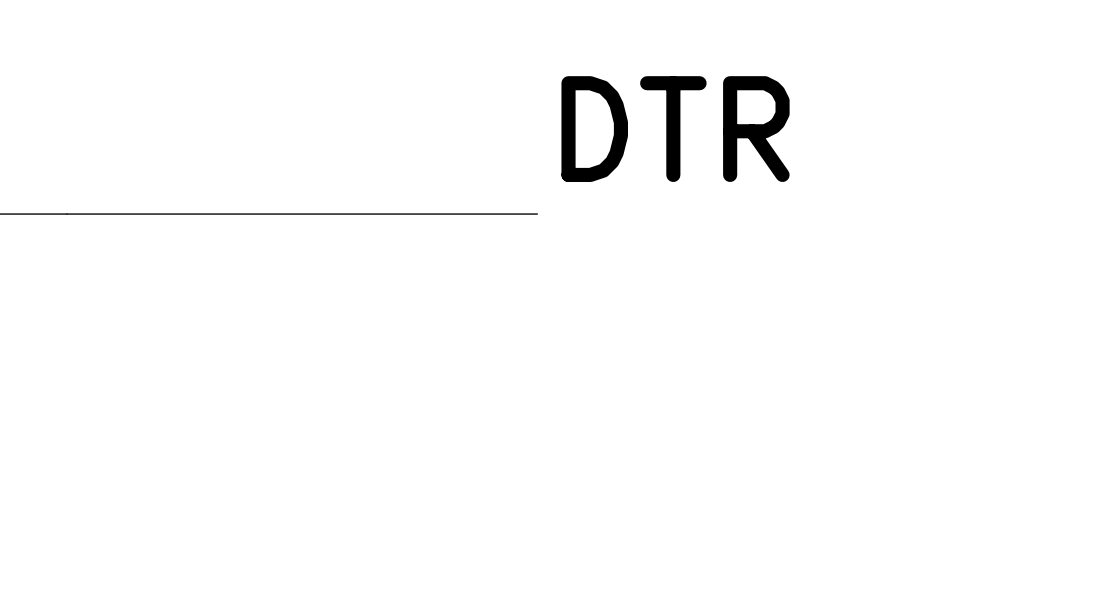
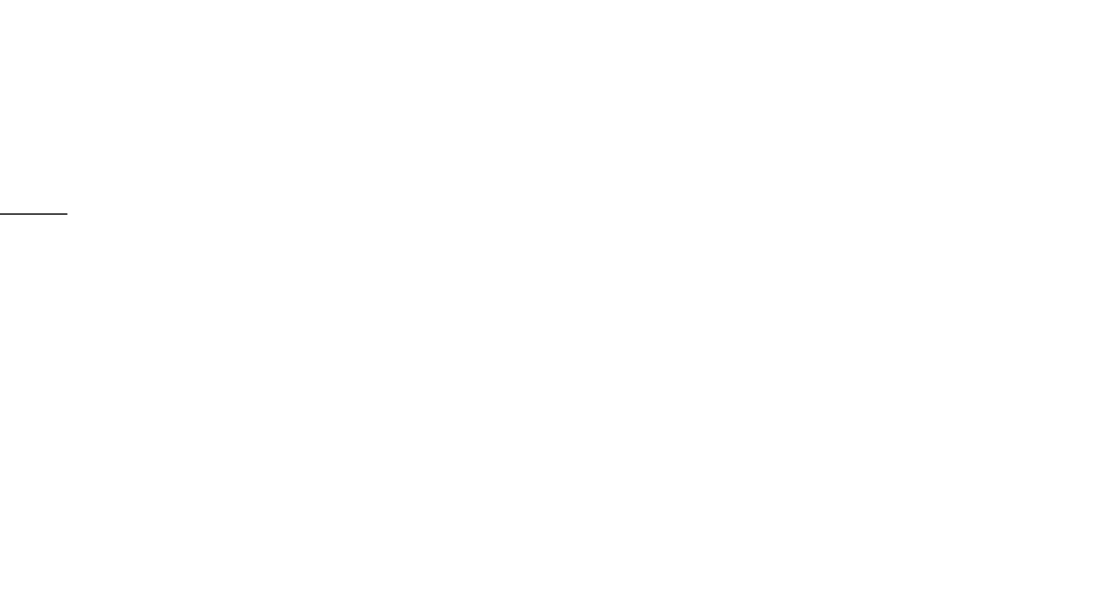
label: DTR (675, 129) -> none
wire: (66, 214) (537, 214) -> none

